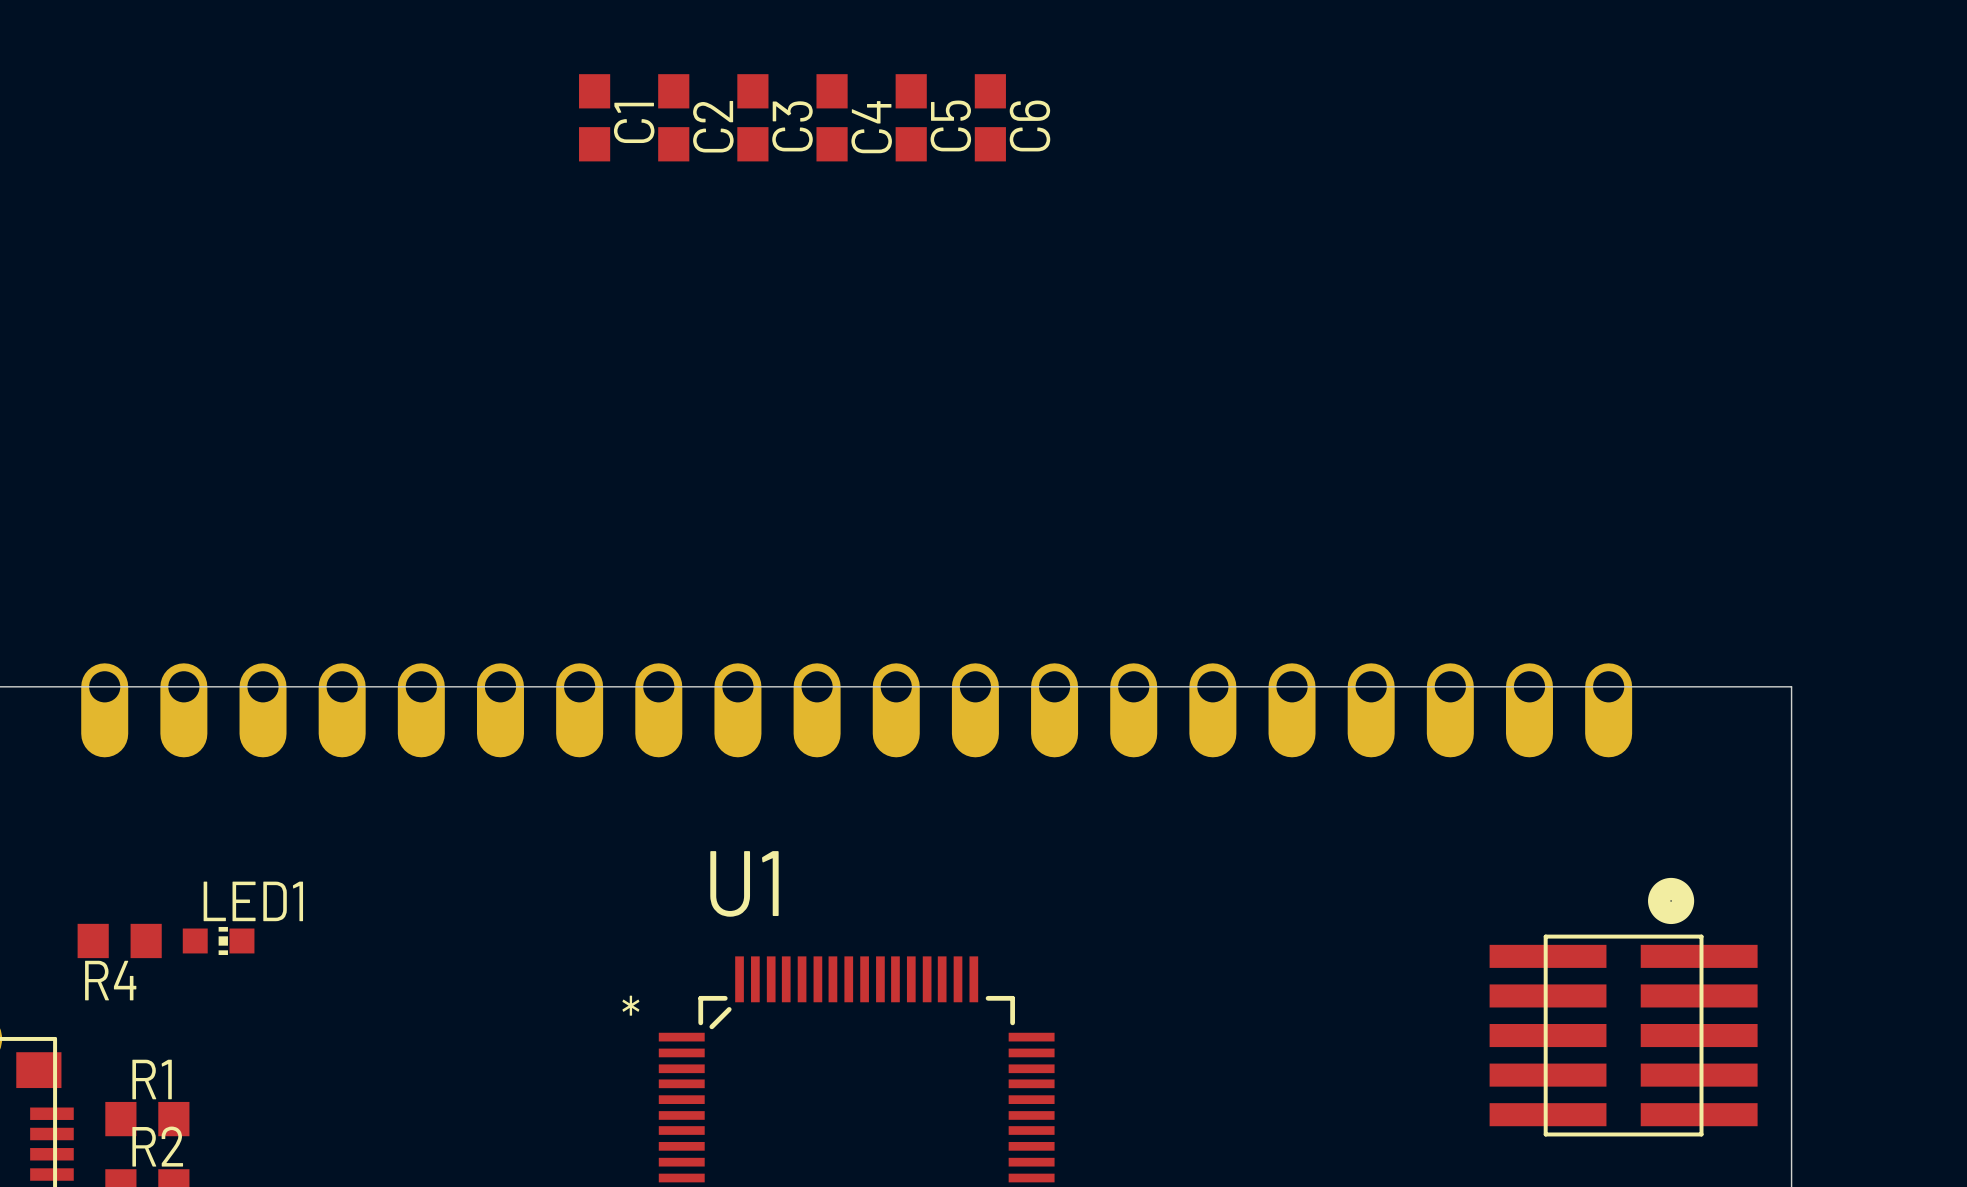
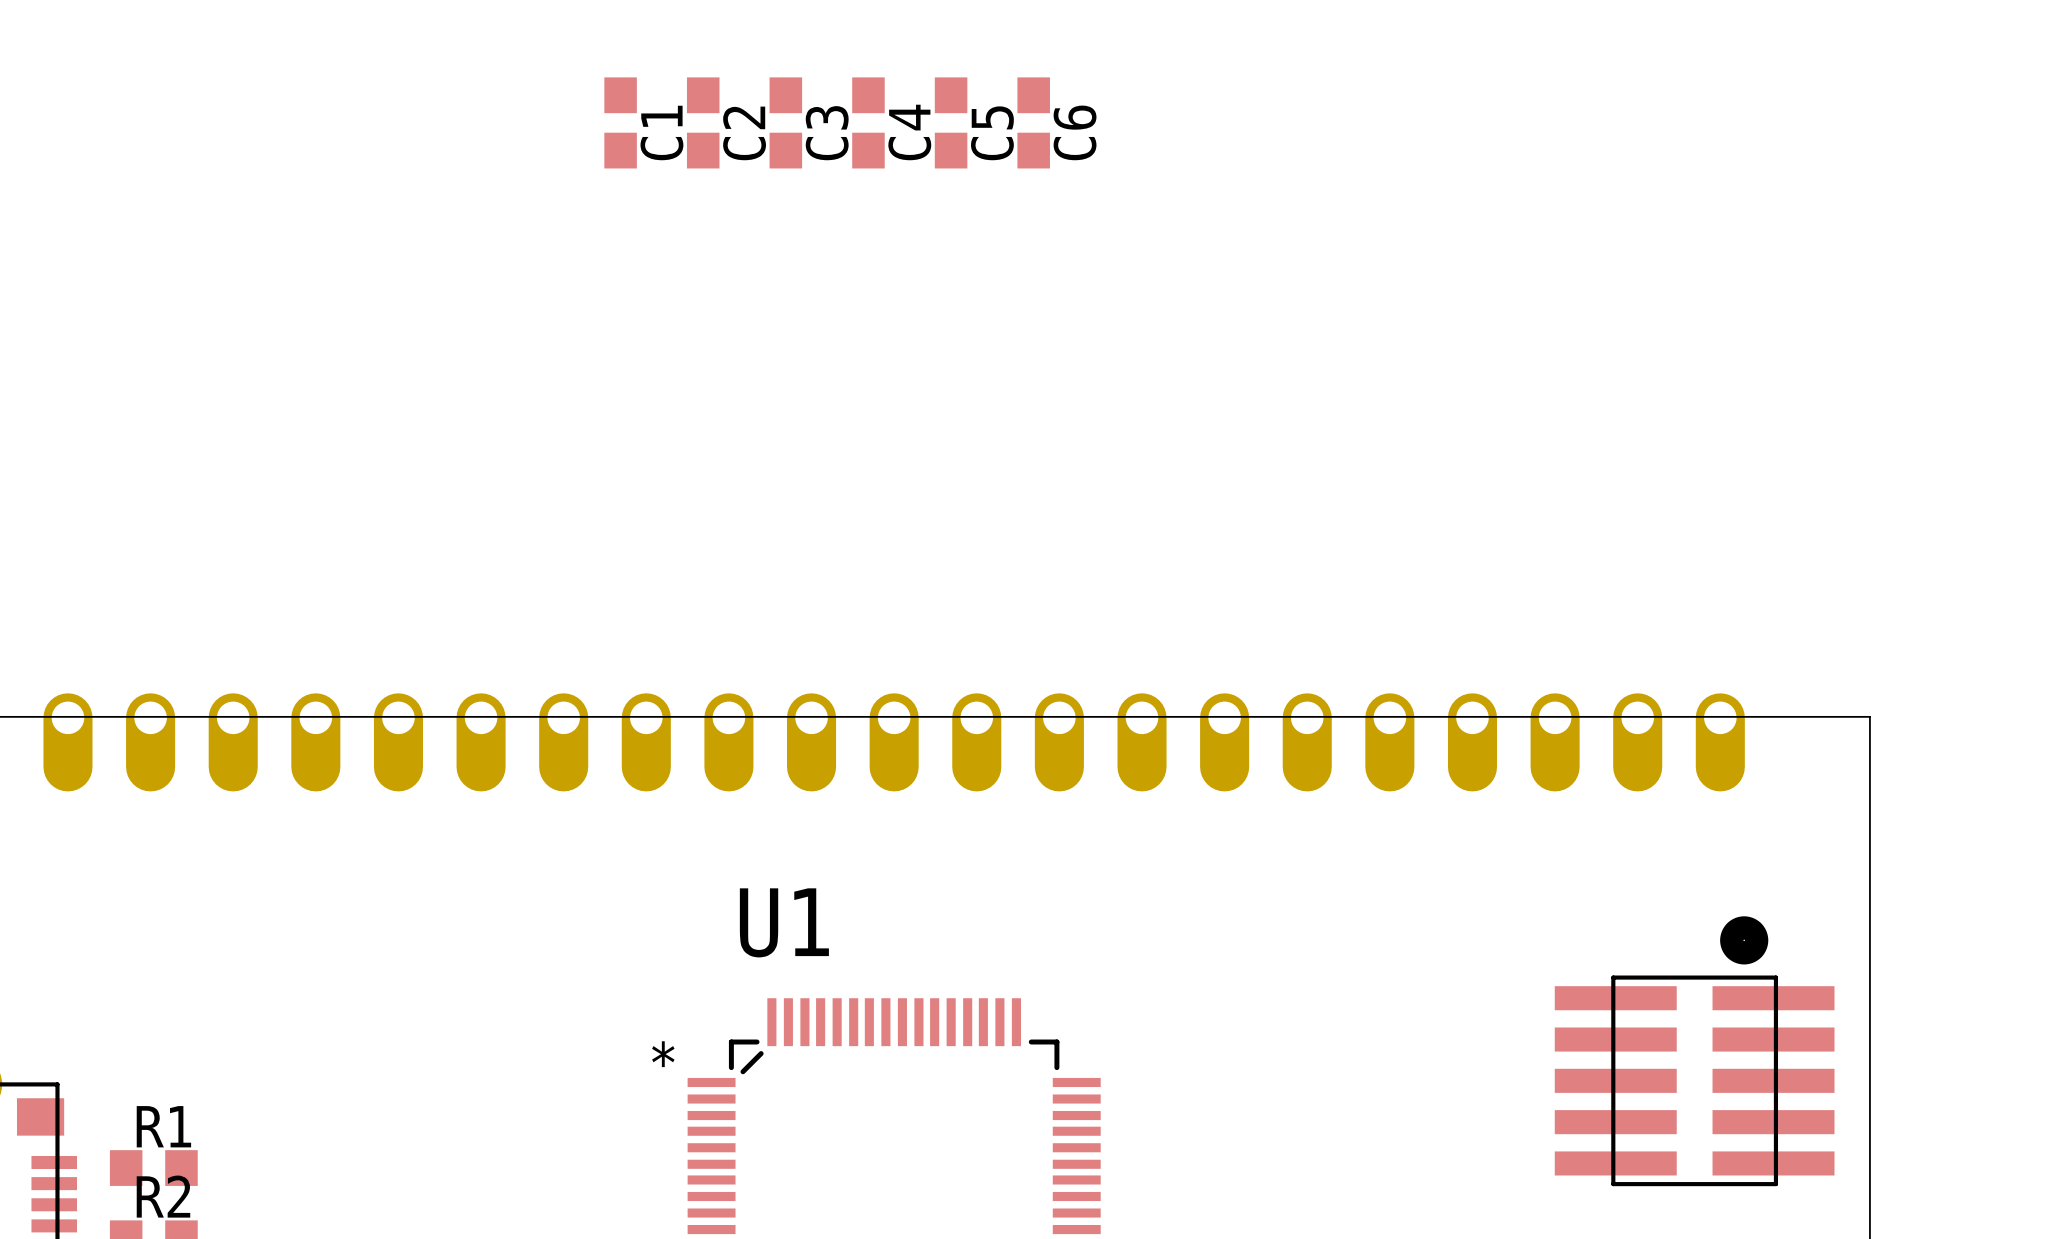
part footprint: [81, 663, 1633, 758] -> [43, 693, 1745, 792]
R4: (119, 940) -> none
LED1: (218, 940) -> none

